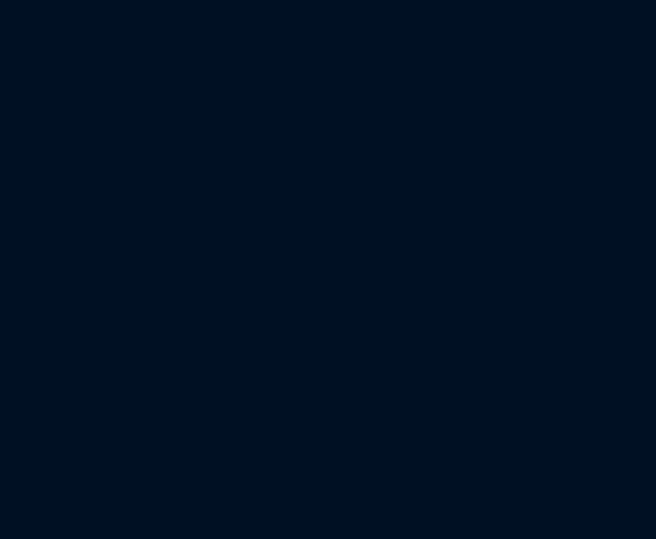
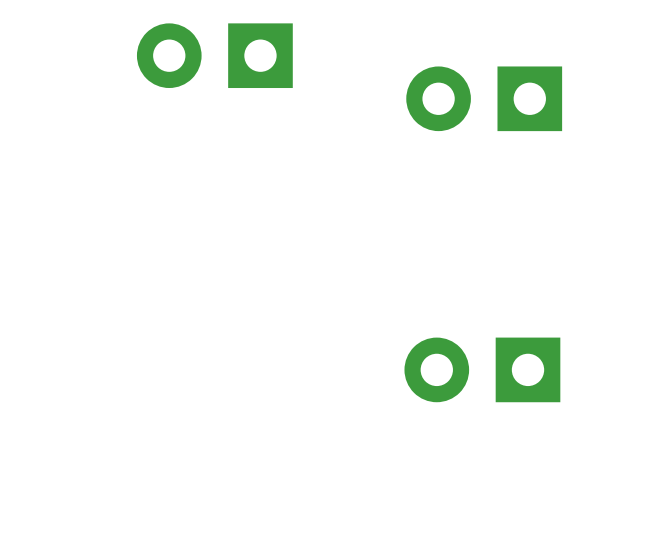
part: none -> (214, 55)
part: none -> (484, 98)
part: none -> (482, 369)

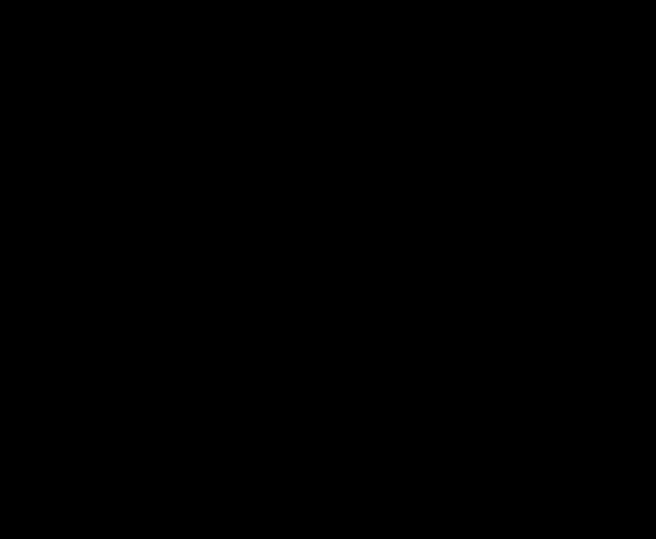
part: (214, 55) -> none
part: (484, 98) -> none
part: (482, 369) -> none

